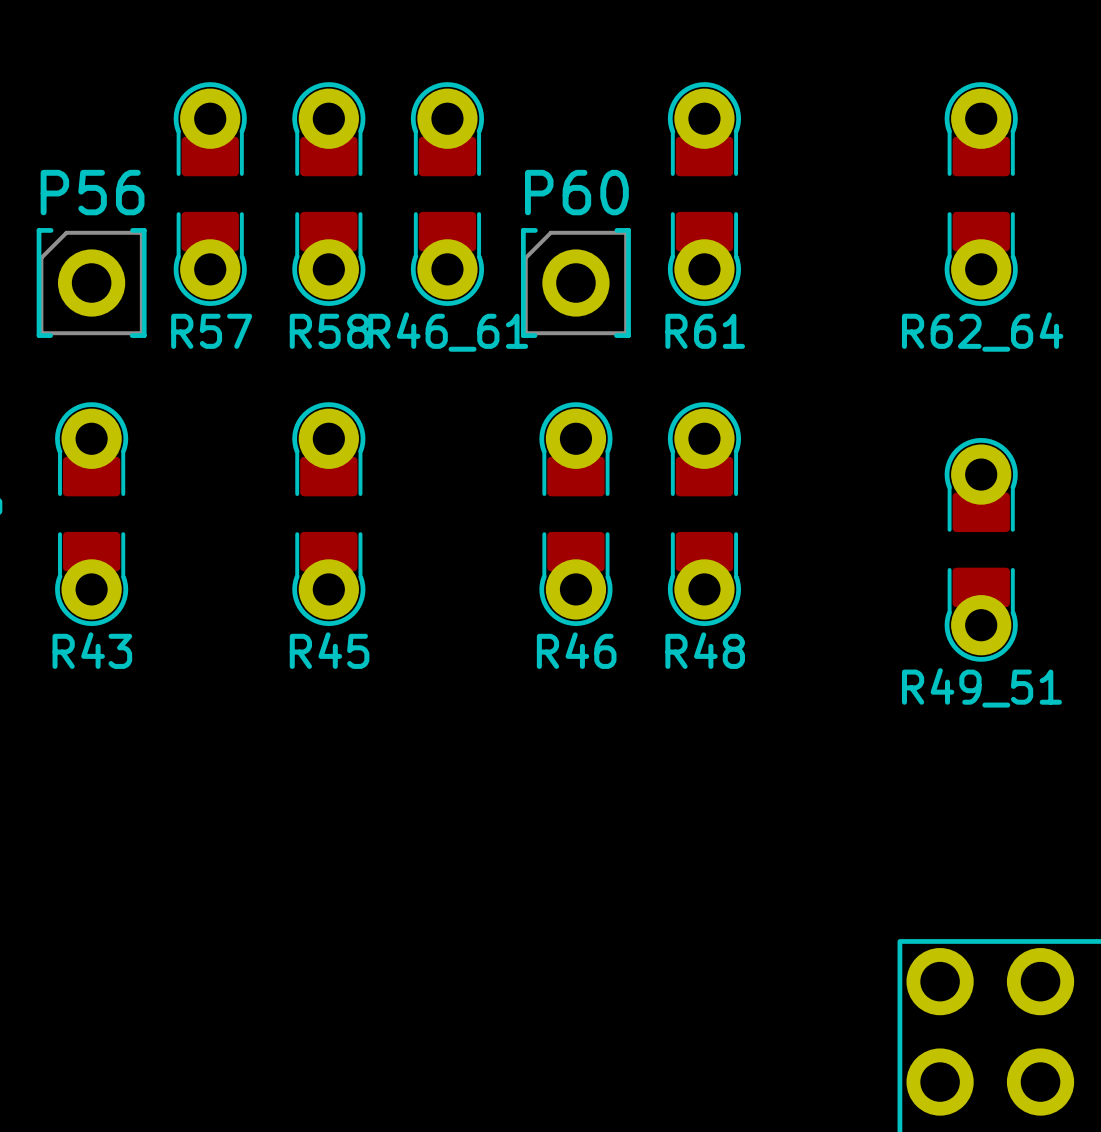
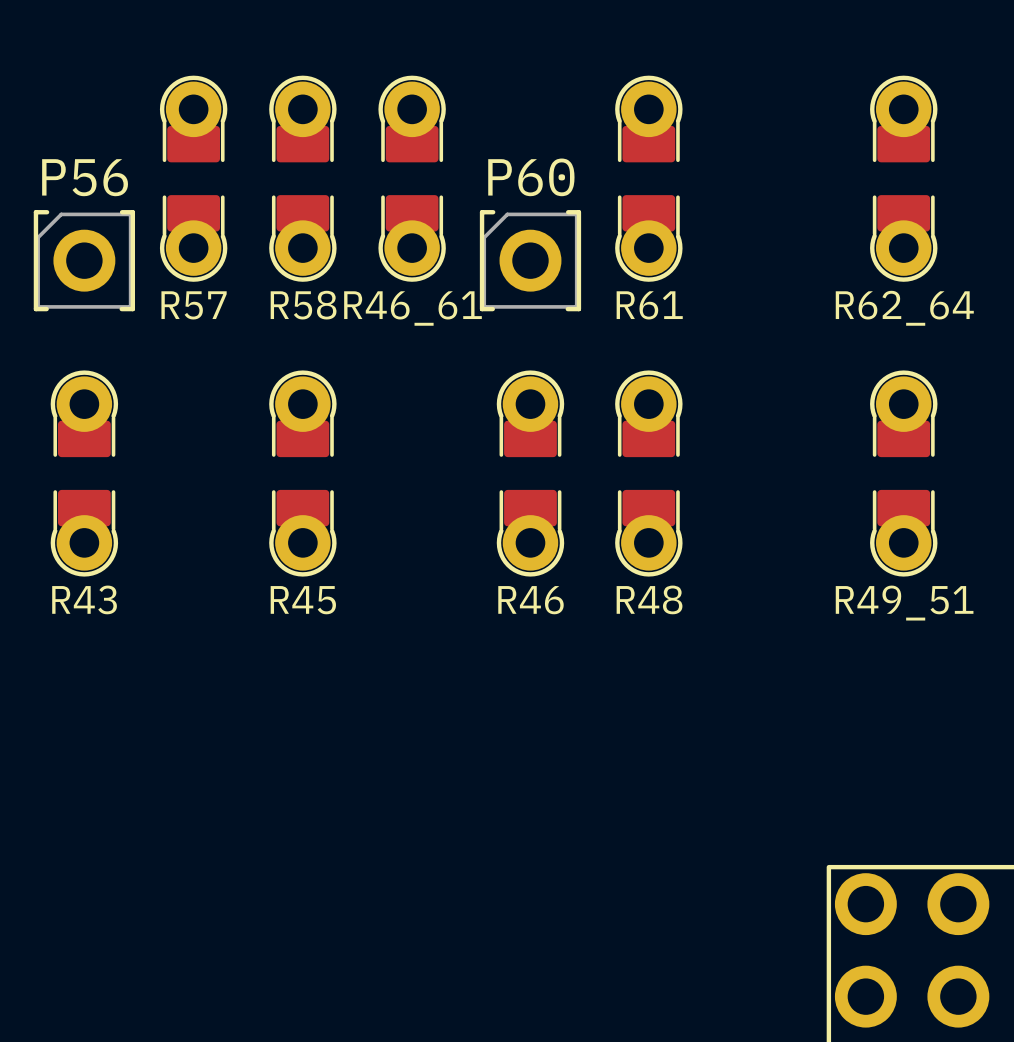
R49_51 position: (981, 549) -> (903, 473)

